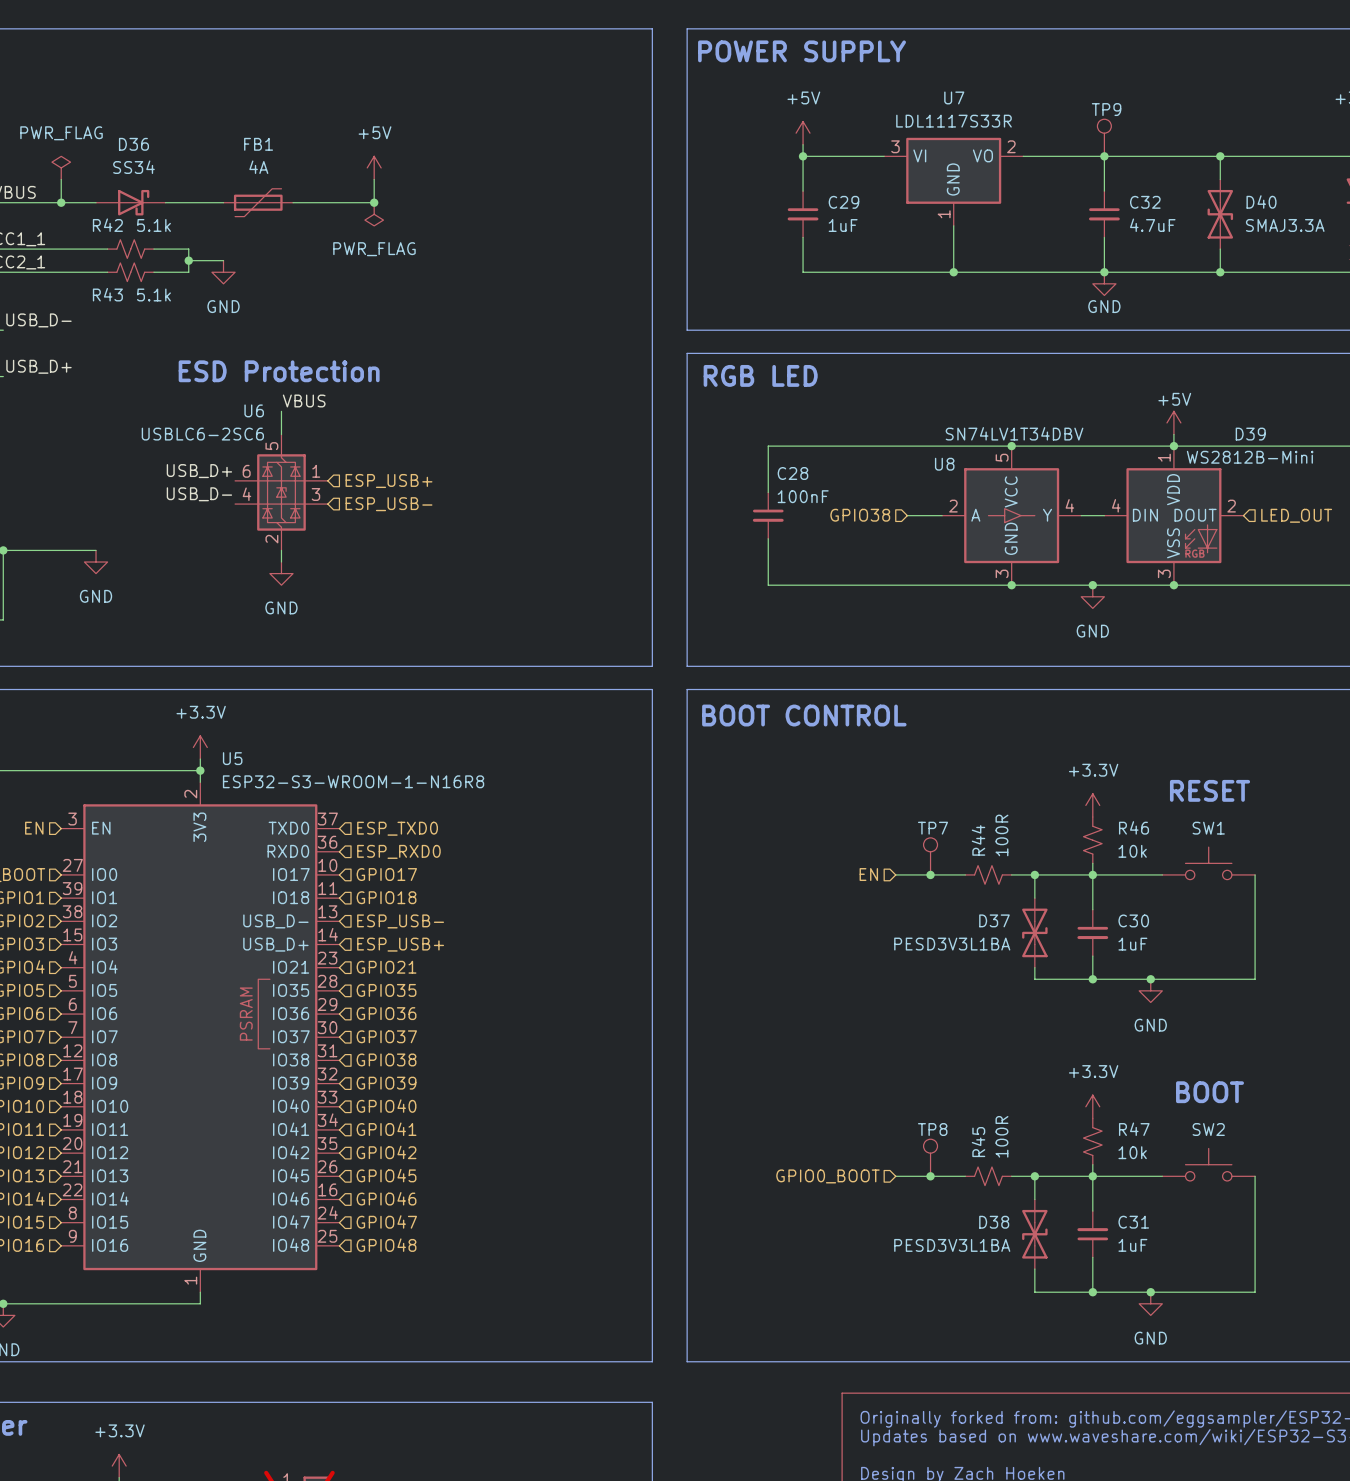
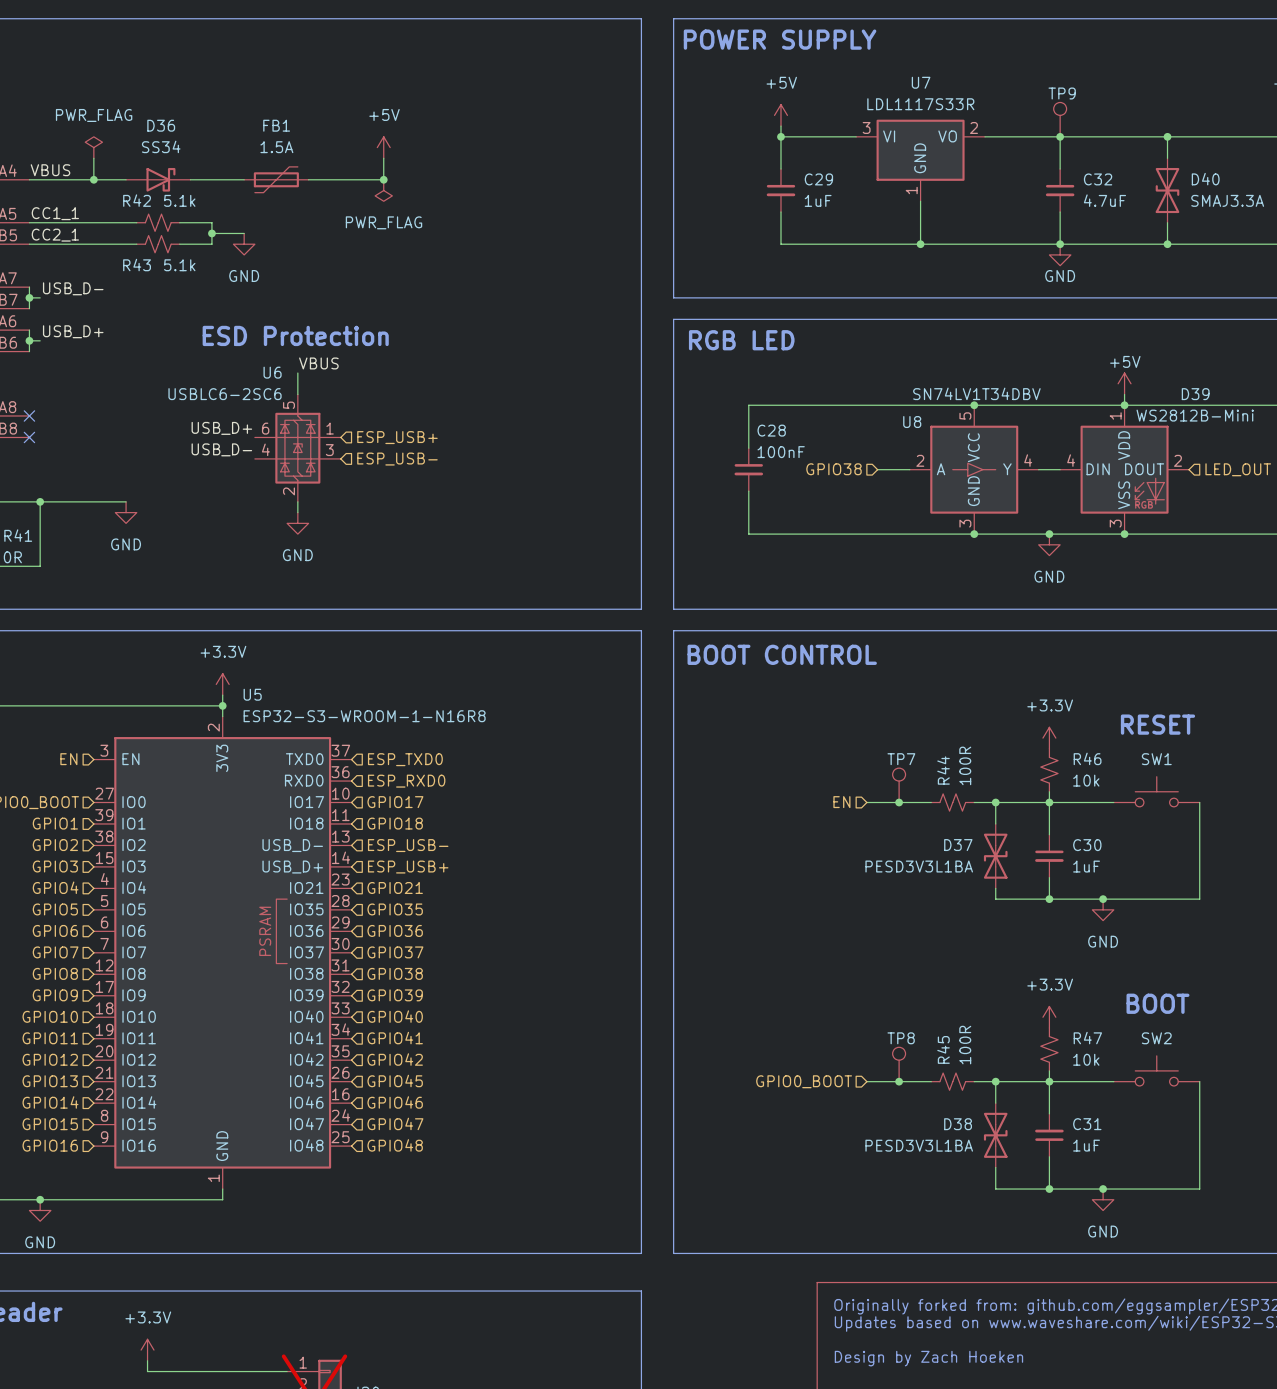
FB1 value: 4A (258, 167) -> 1.5A (276, 147)

